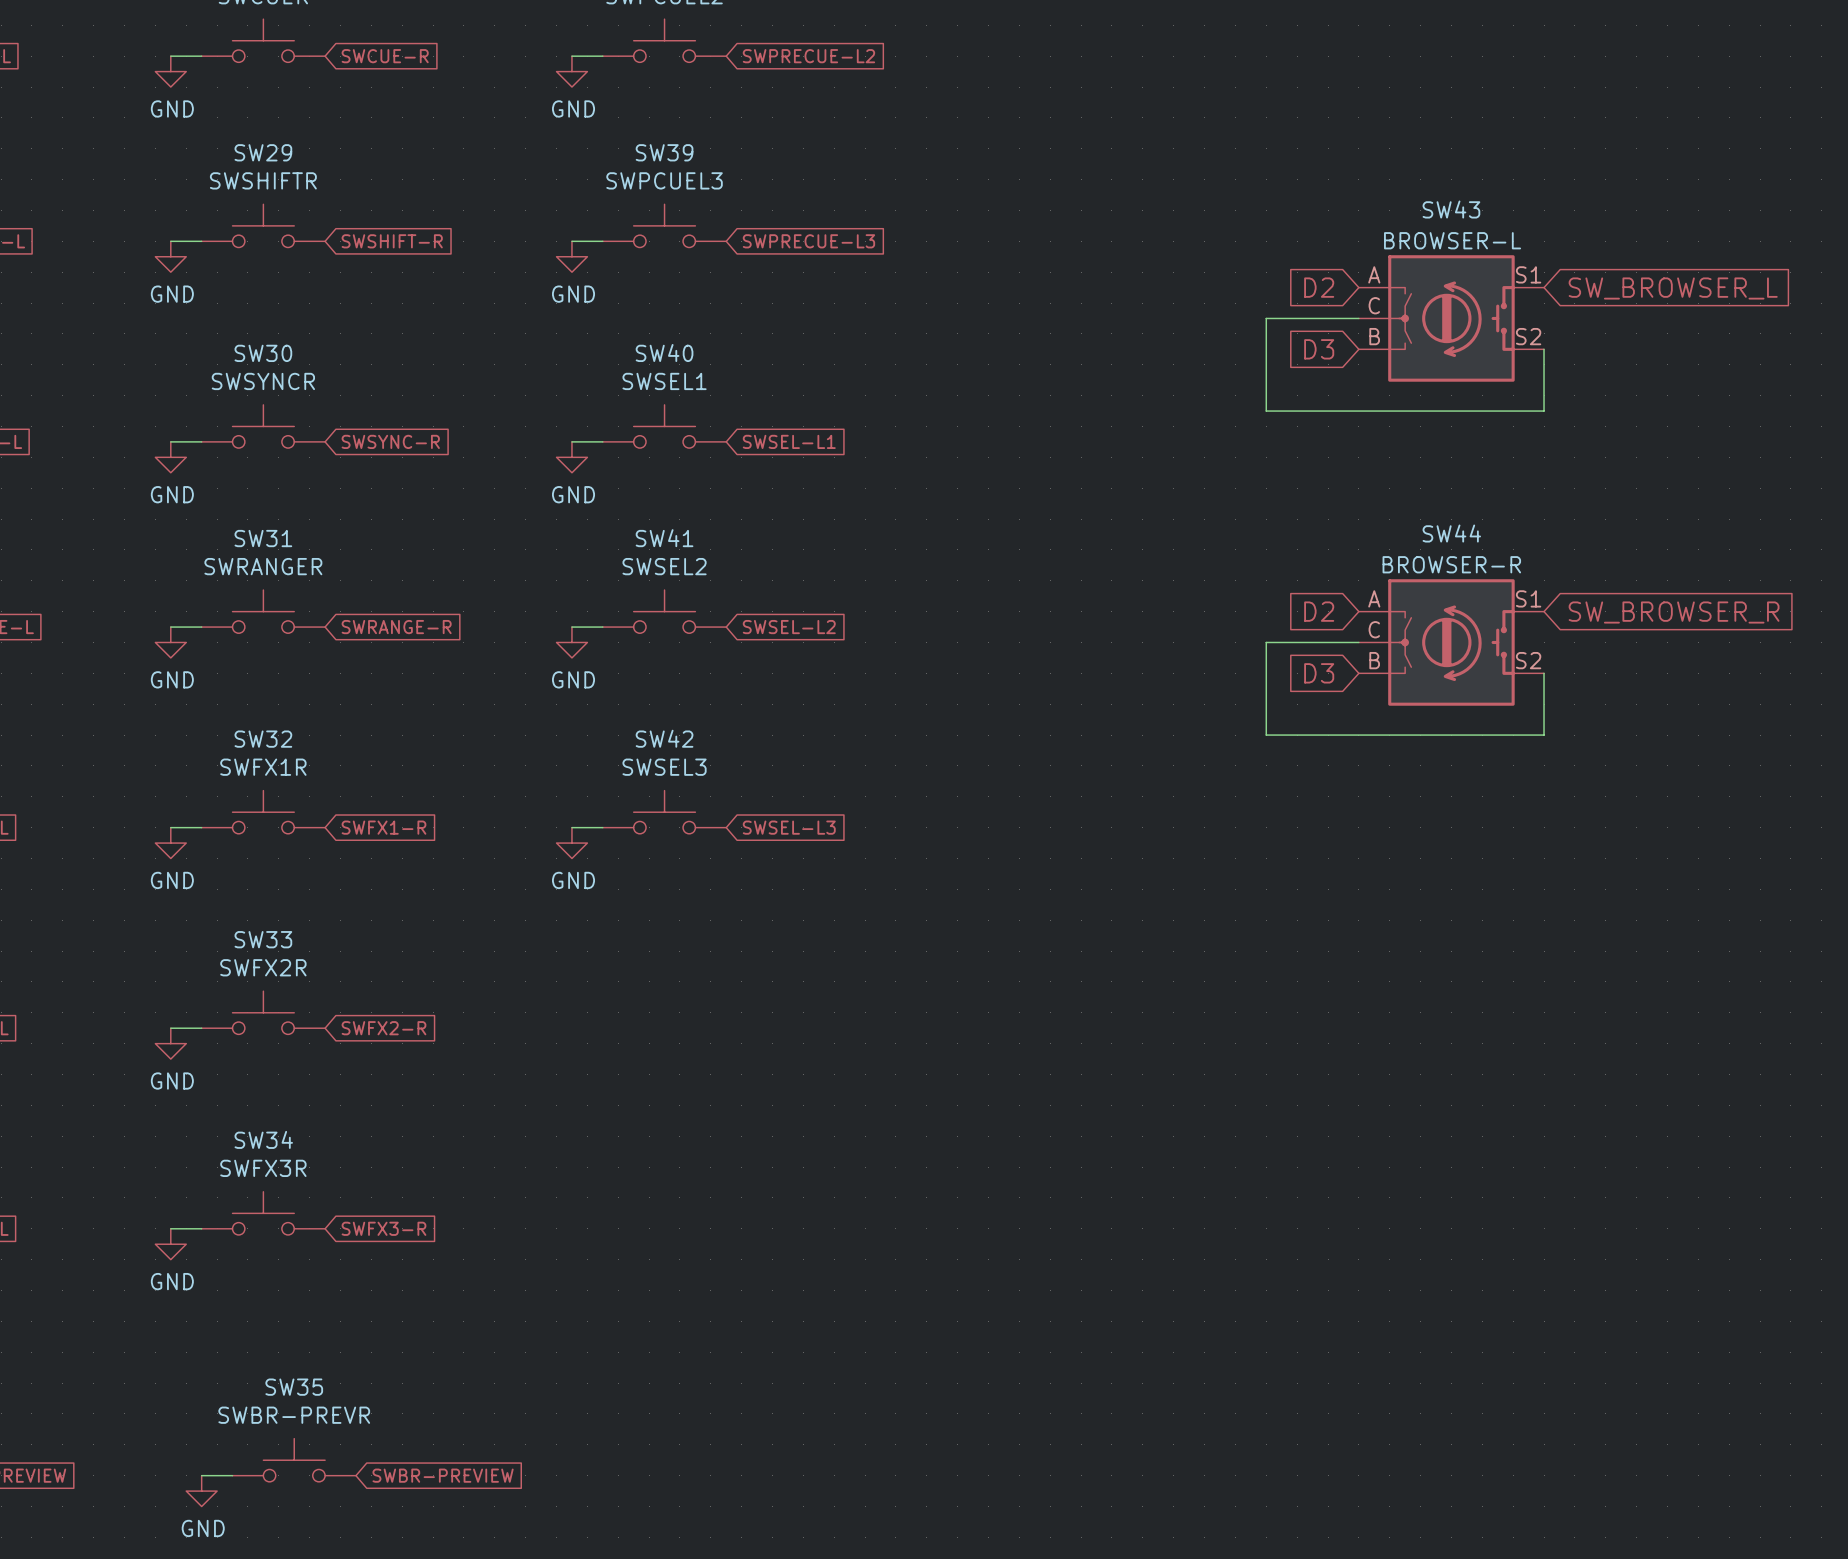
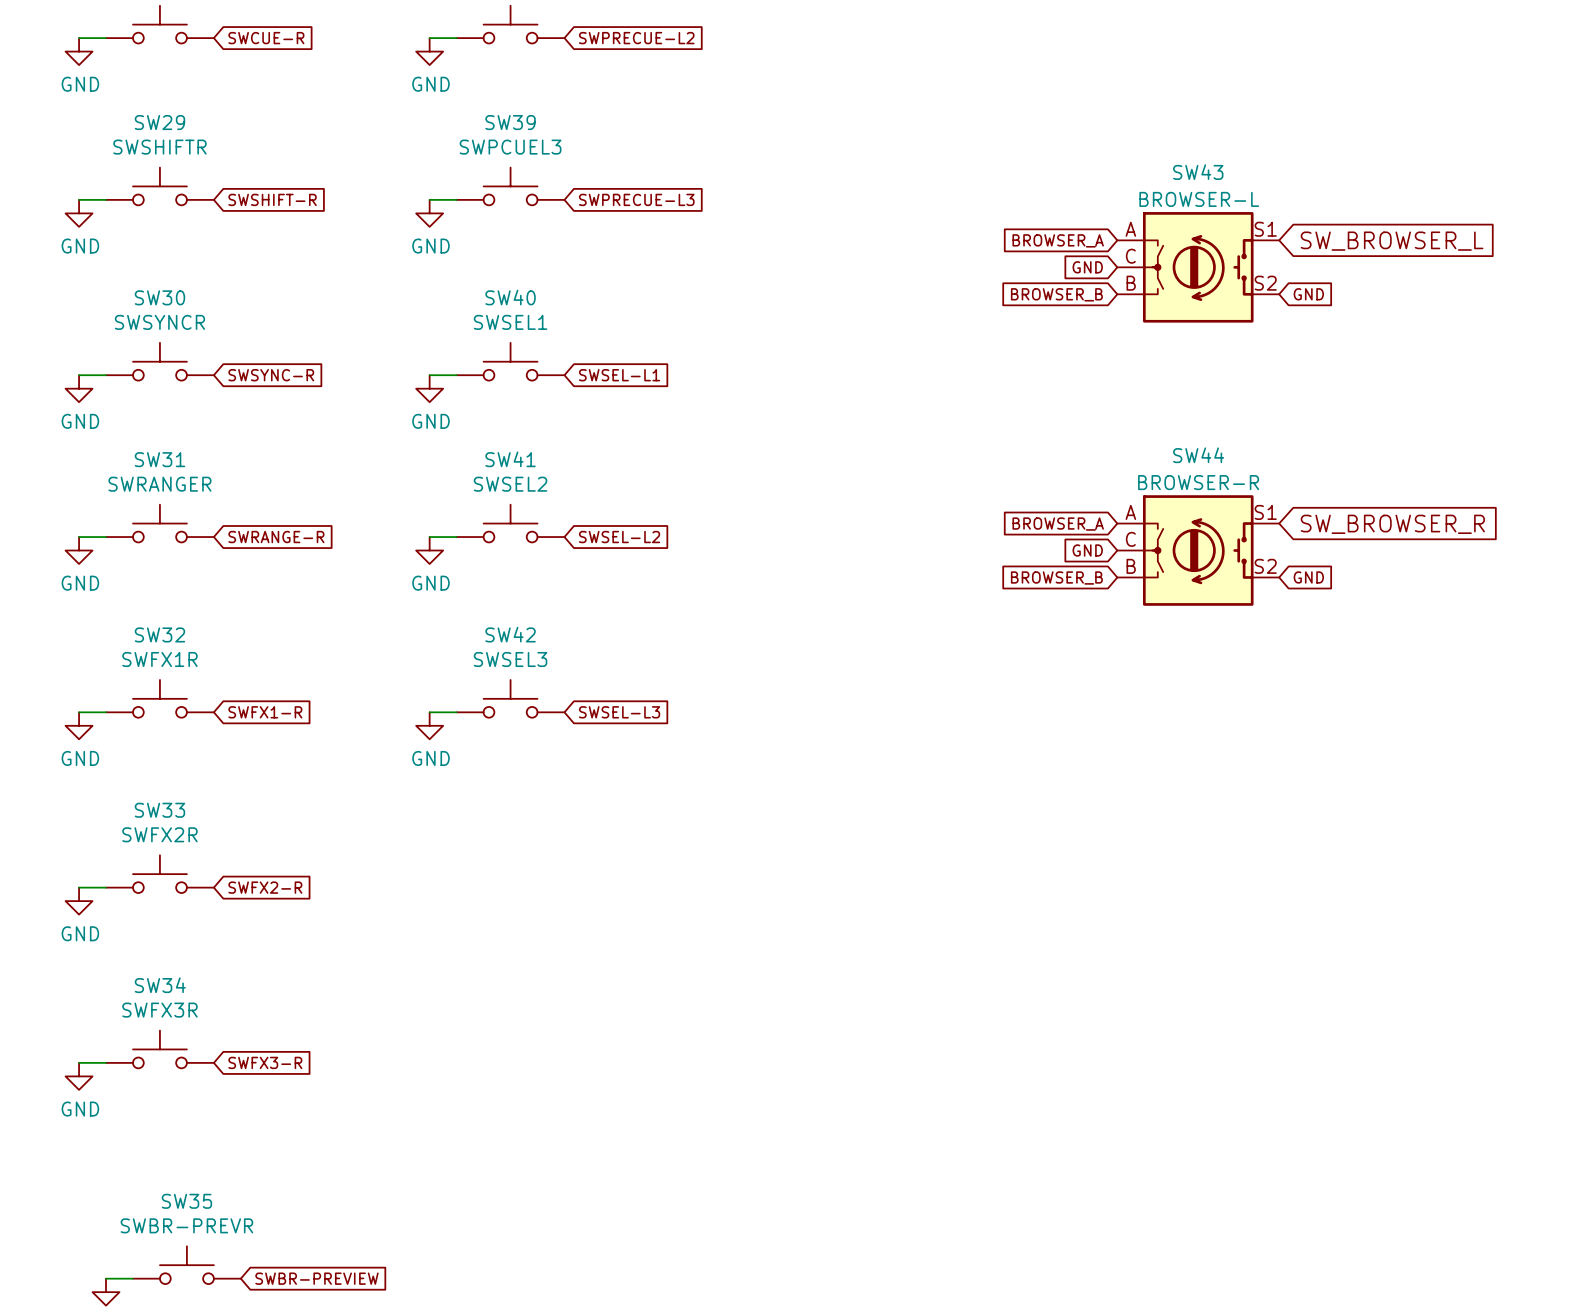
global label: D2 (1319, 287) -> BROWSER_A (1058, 240)
global label: none -> GND (1087, 267)
wire: (1358, 318) (1266, 318) (1266, 411) (1544, 411) (1544, 349) -> none
global label: D3 (1319, 349) -> BROWSER_B (1056, 294)
global label: none -> GND (1308, 294)
global label: D2 (1319, 611) -> BROWSER_A (1058, 524)
global label: none -> GND (1087, 550)
wire: (1358, 642) (1266, 642) (1266, 735) (1544, 735) (1544, 673) -> none
global label: D3 (1319, 673) -> BROWSER_B (1056, 577)
global label: none -> GND (1308, 577)

